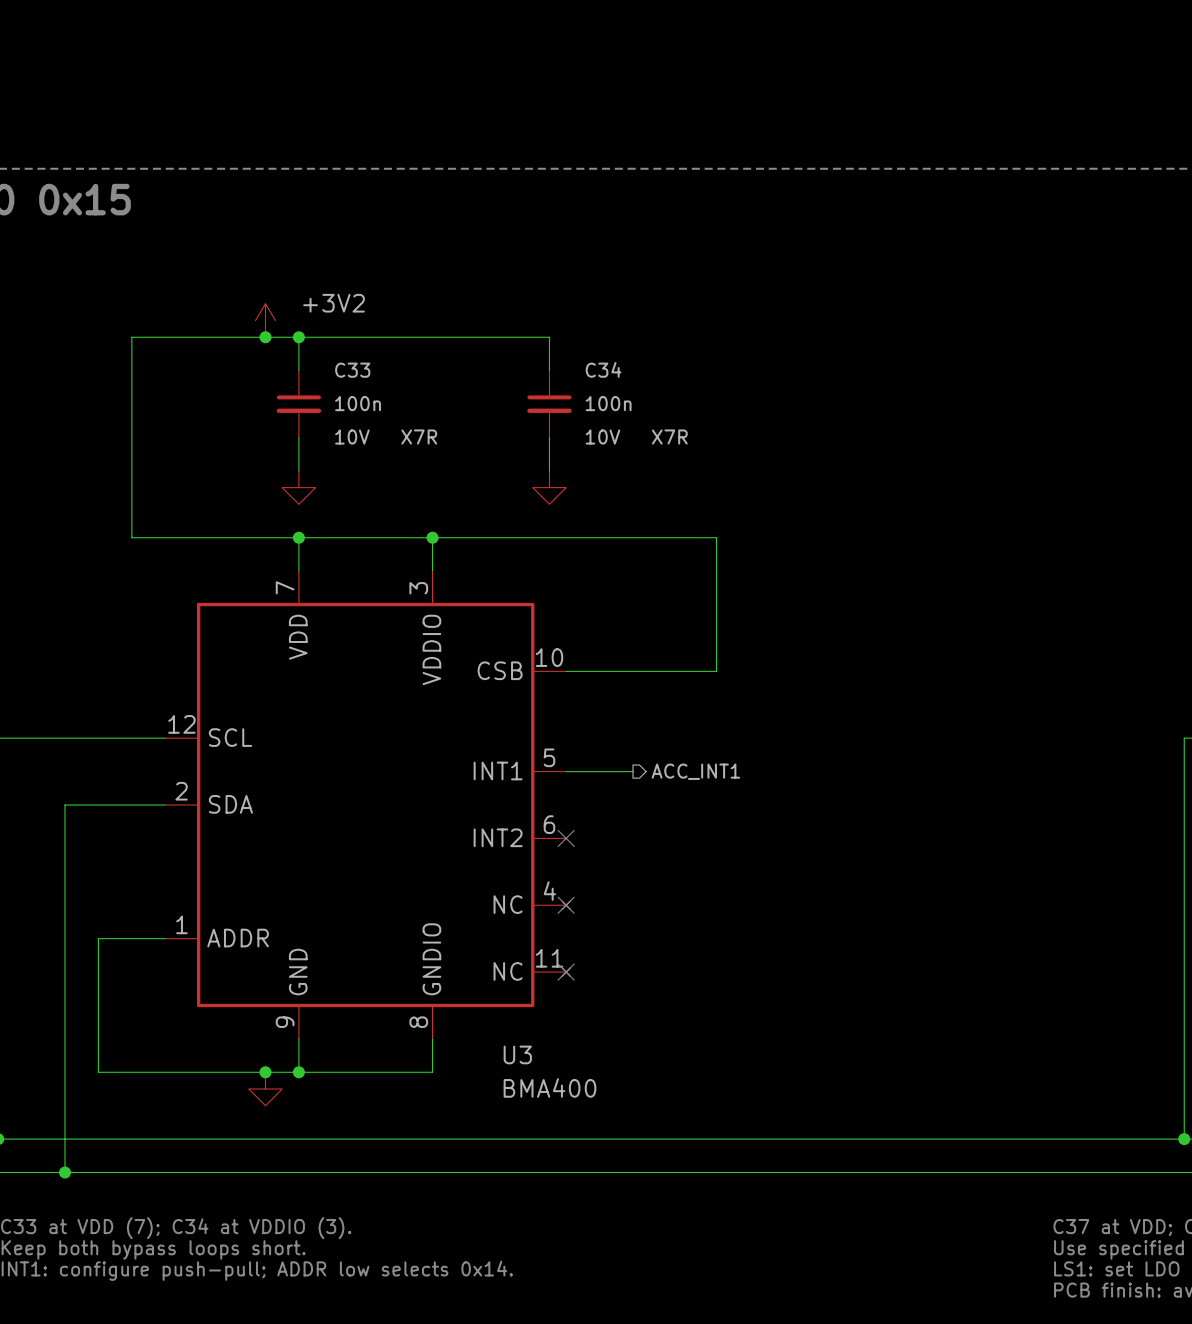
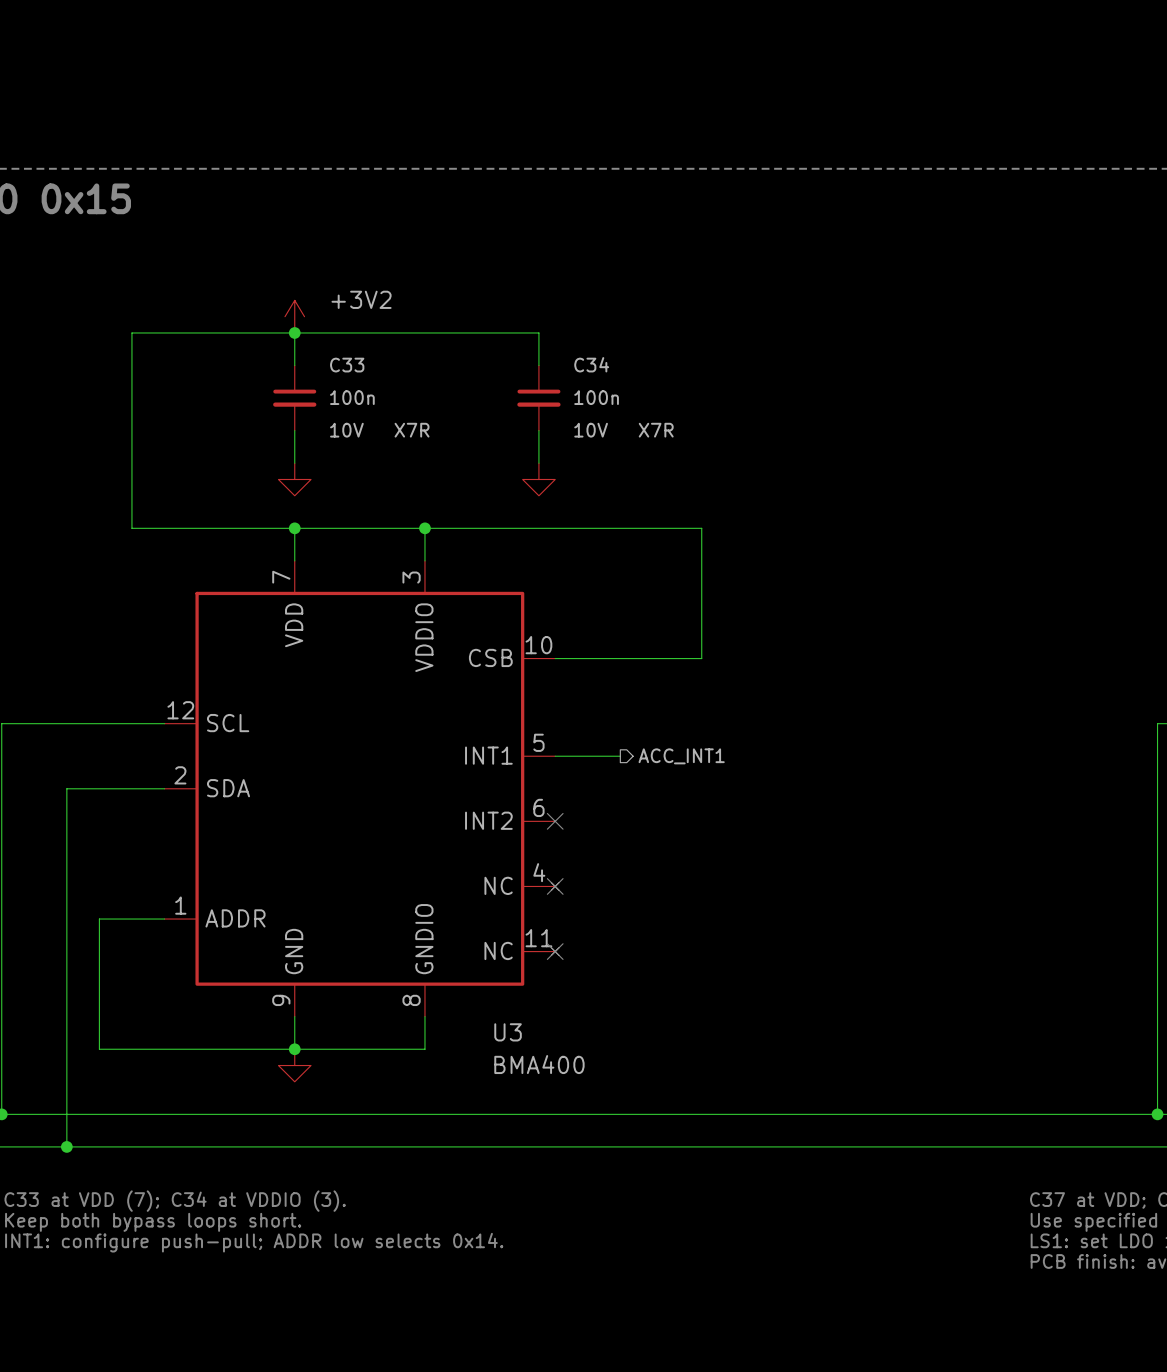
power symbol position: +3V2 (265, 320) -> +3V2 (294, 316)
junction: (265, 337) -> none
junction: (265, 1072) -> none
power symbol position: (265, 1089) -> (294, 1065)

